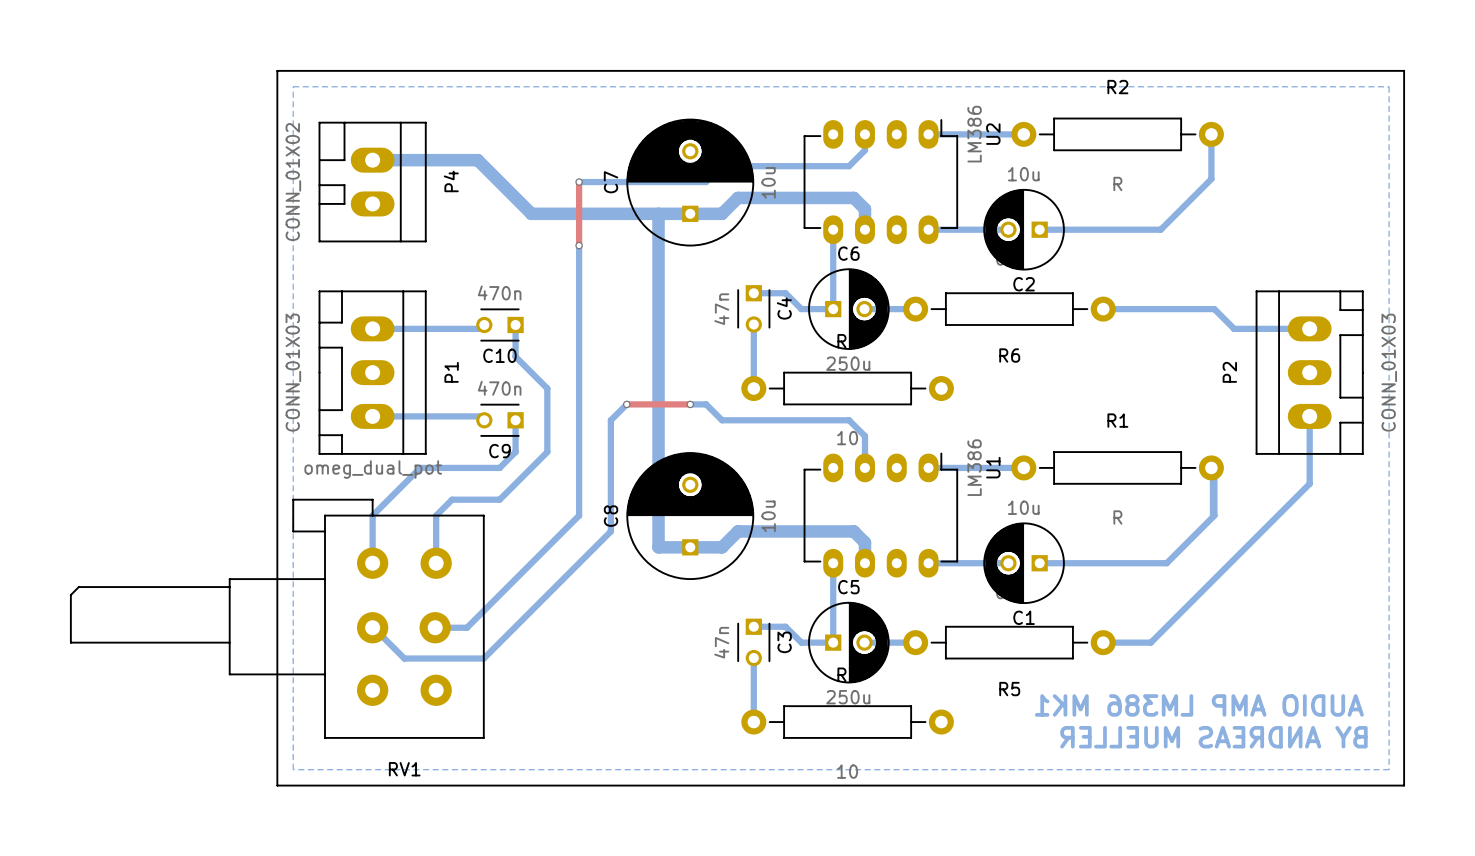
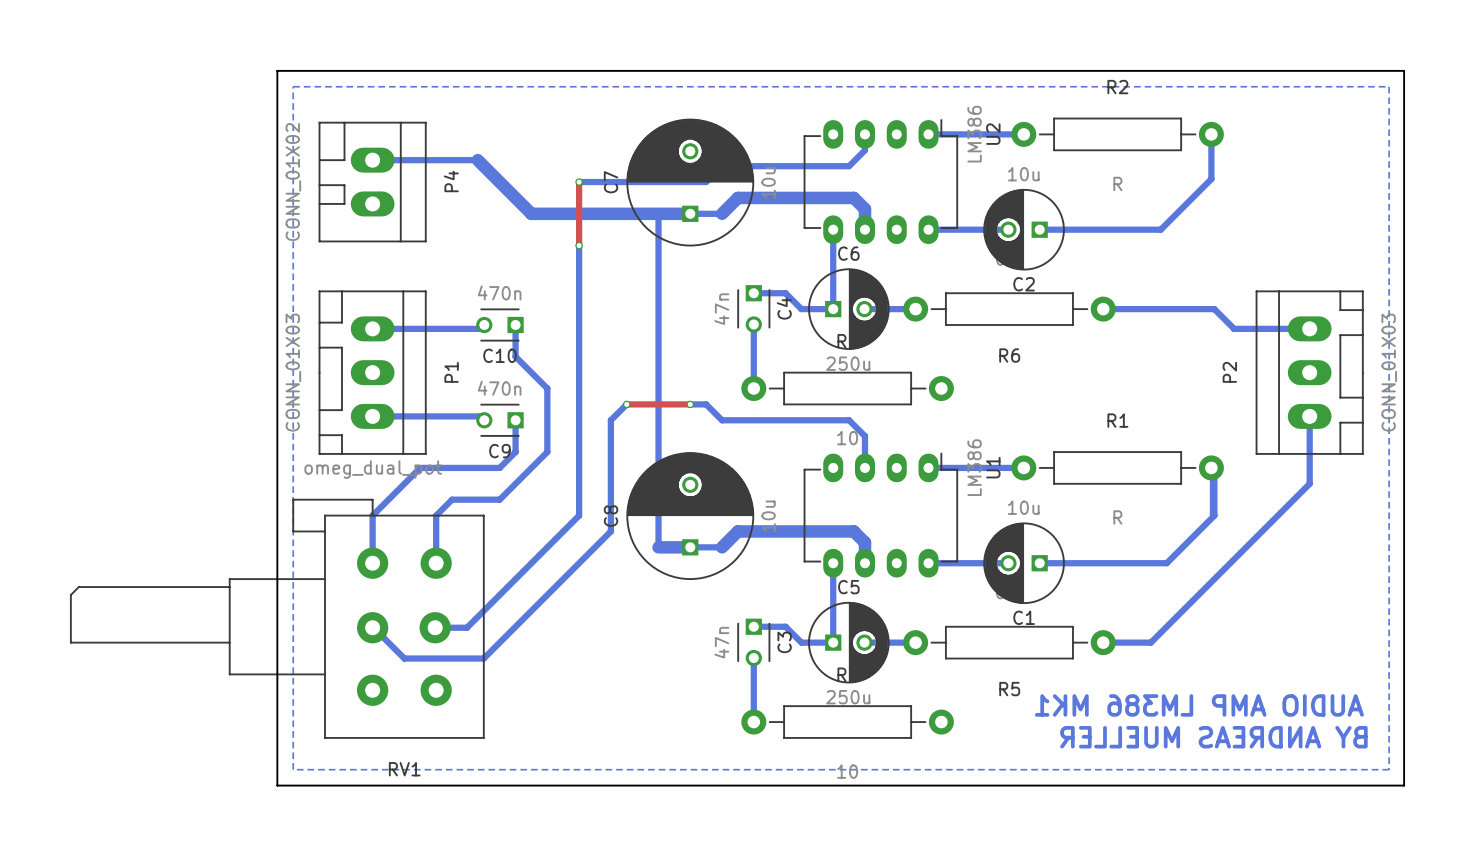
bottom track width: thick (372, 160) (477, 160) -> thin (372, 160) (477, 160)
bottom track width: thick (658, 213) (658, 547) -> thin (658, 213) (658, 547)
bottom track width: thick (690, 213) (722, 213) -> thin (690, 213) (722, 213)
bottom track width: thick (690, 547) (722, 547) -> thin (690, 547) (722, 547)

